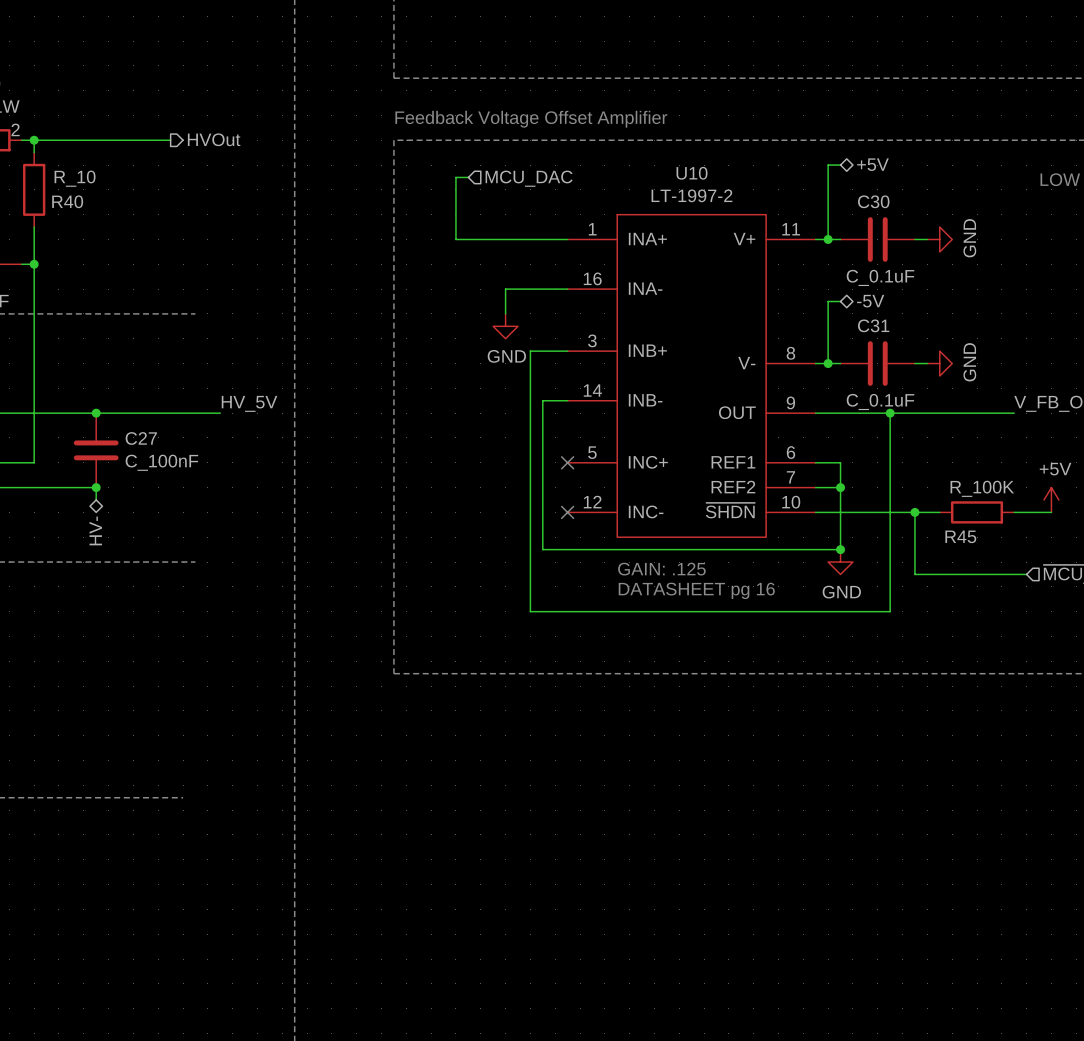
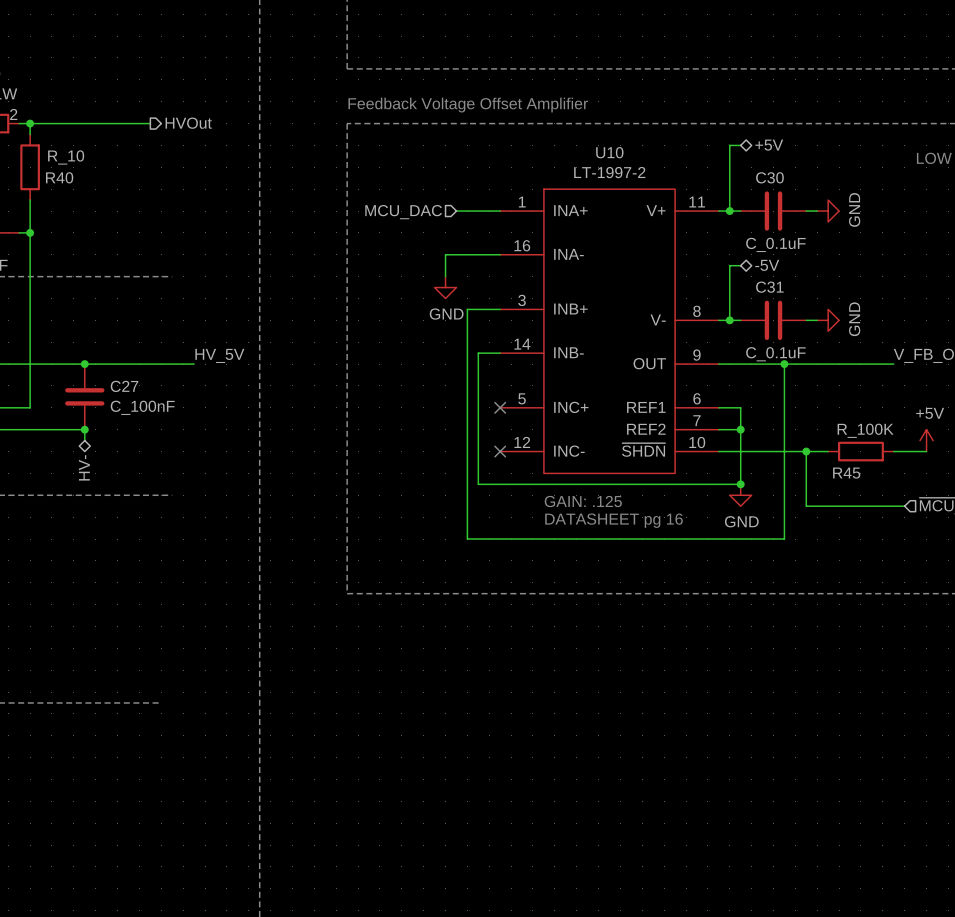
wire: (468, 177) (455, 177) (455, 239) (517, 239) -> none
hierarchical label rotation: 0° (529, 178) -> 180° (403, 212)
hierarchical label position: MCU_DAC (529, 178) -> MCU_DAC (403, 212)

